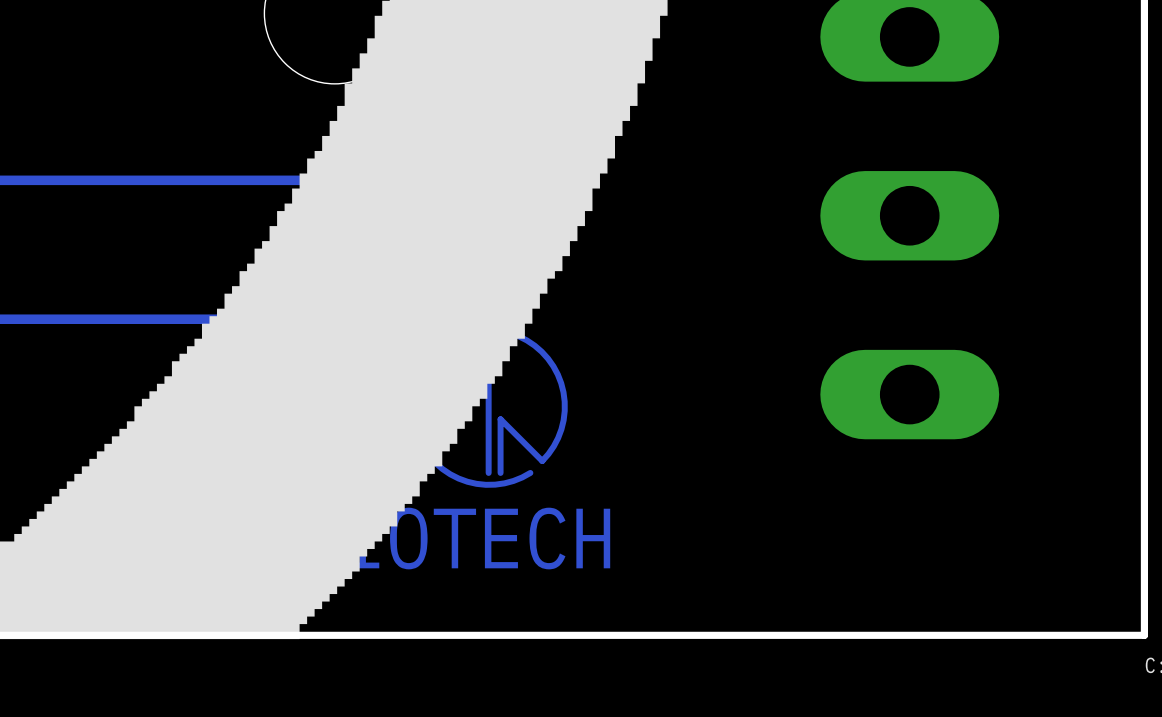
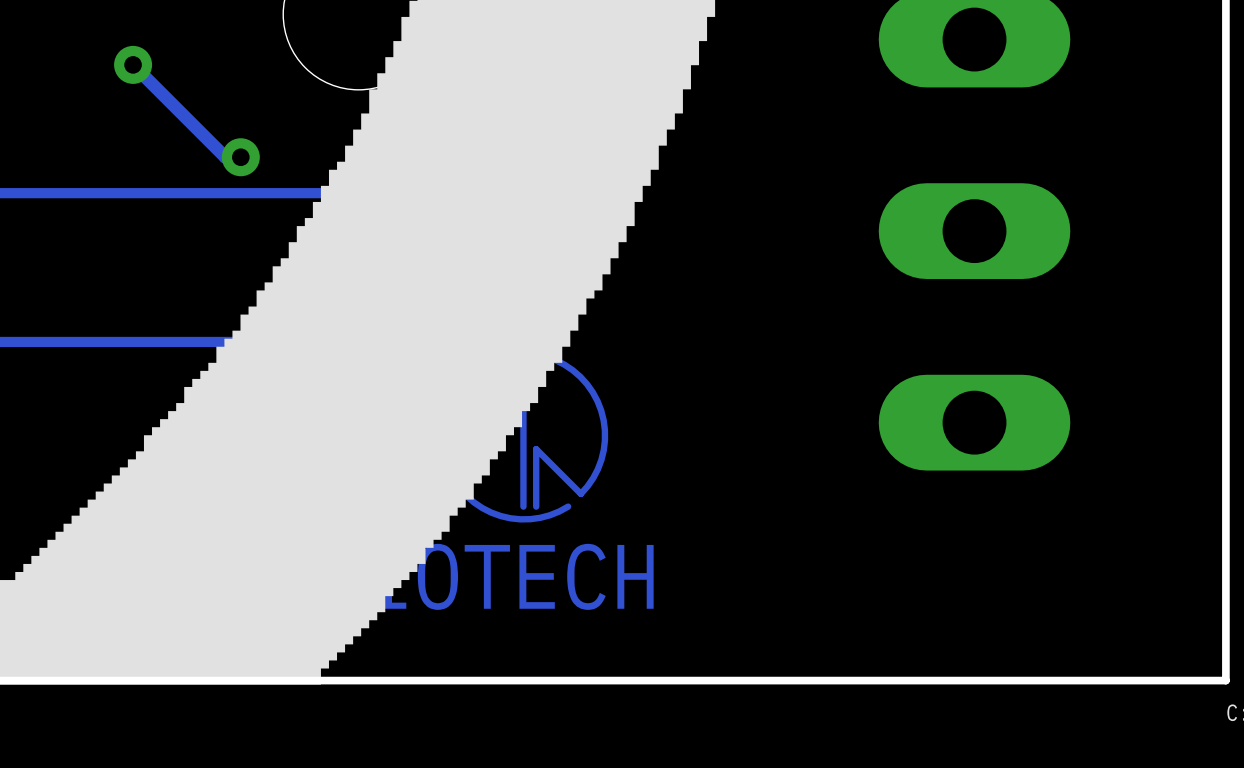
track: none -> (133, 64) (225, 157) (240, 157)
via: none -> (133, 64)
via: none -> (240, 157)

